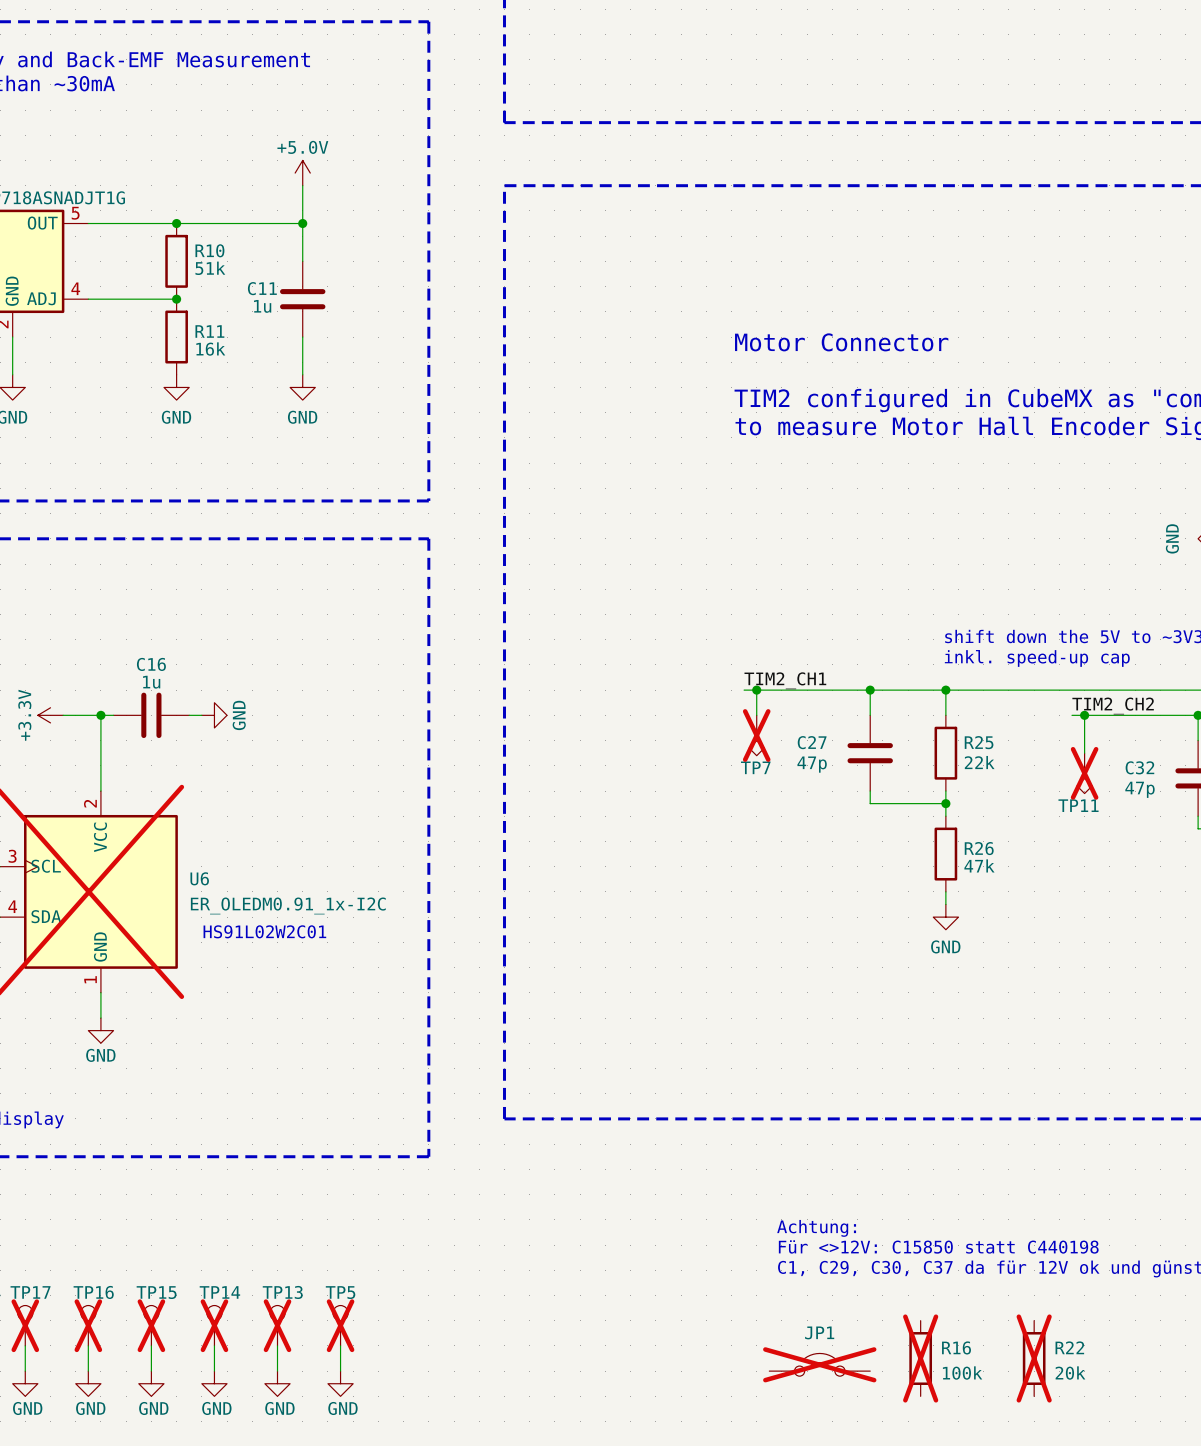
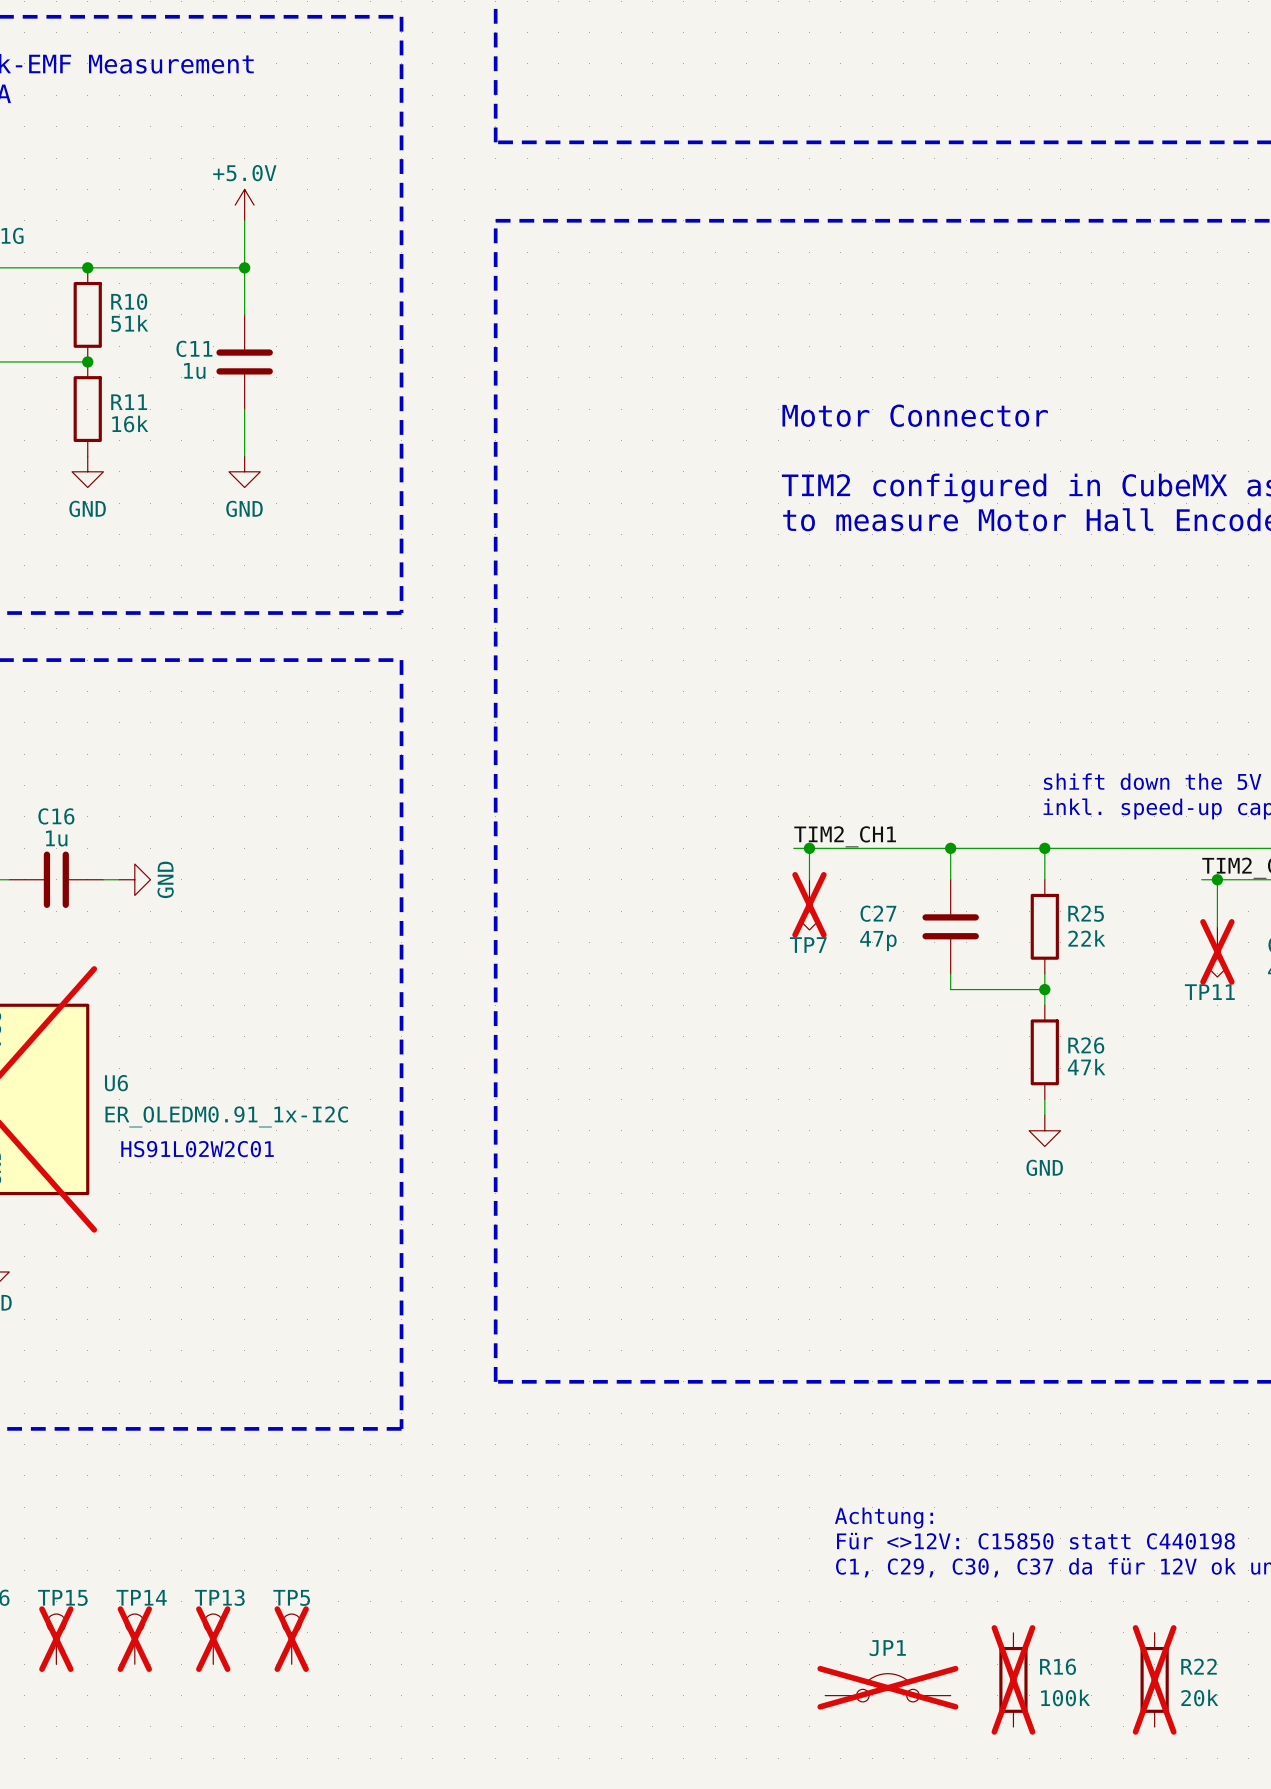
wire: (151, 1345) (151, 1371) -> none
wire: (214, 1345) (214, 1371) -> none
wire: (277, 1345) (277, 1371) -> none
wire: (340, 1345) (340, 1371) -> none
power symbol: GND (151, 1383) -> none
power symbol: GND (214, 1383) -> none
power symbol: GND (277, 1383) -> none
power symbol: GND (340, 1383) -> none

